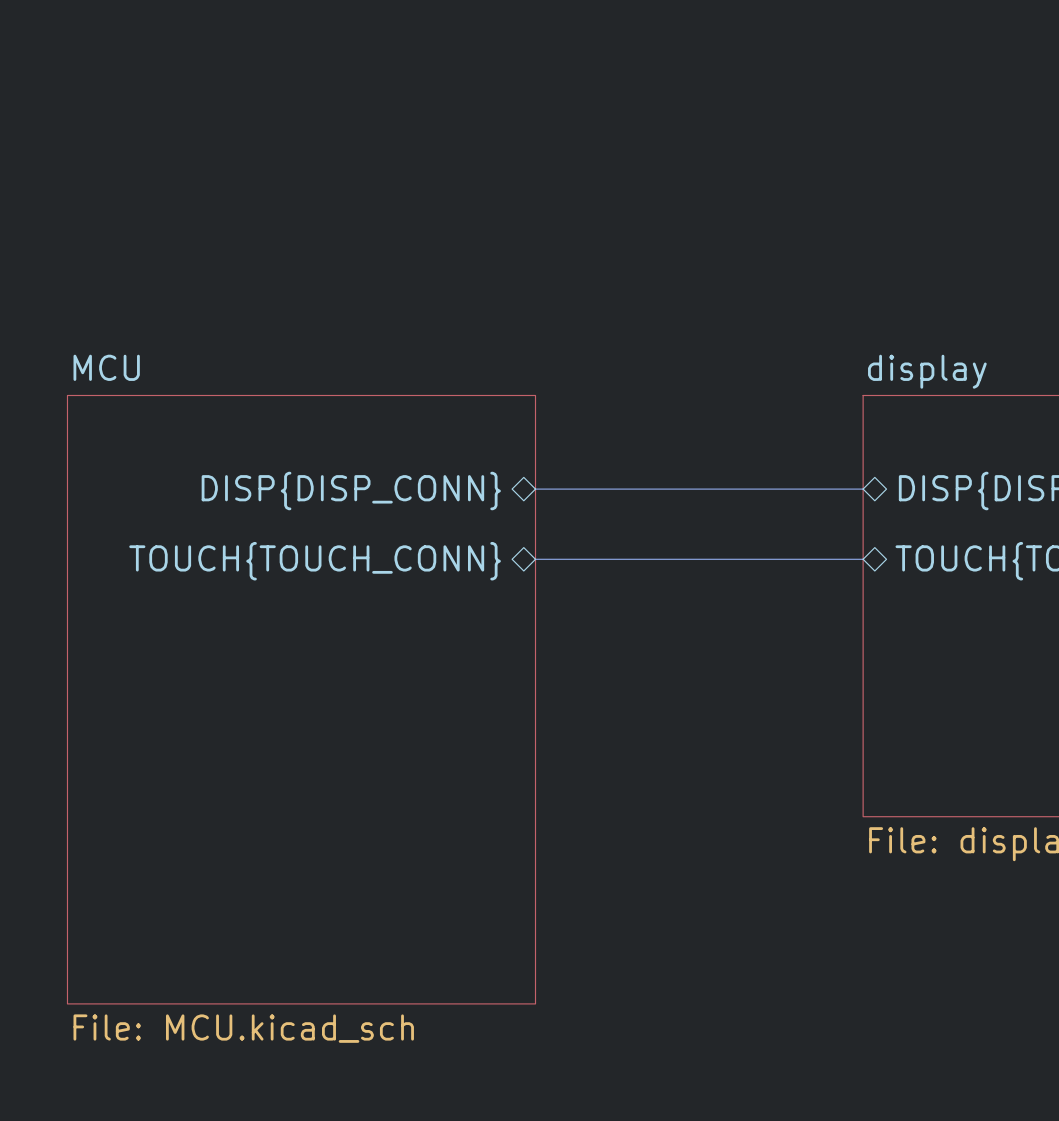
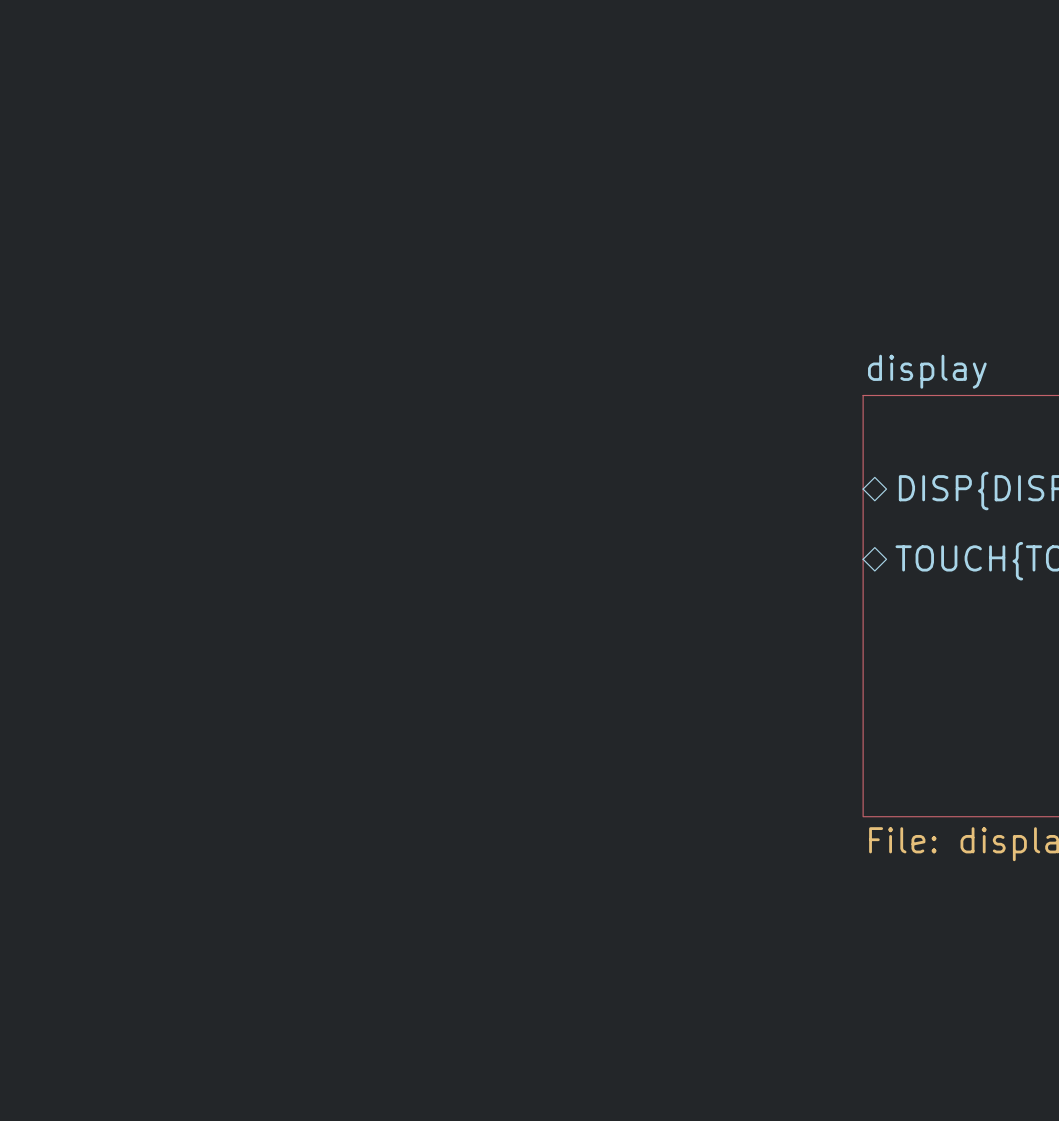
bus: (535, 489) (863, 489) -> none
sheet pin: DISP{DISP_CONN} (351, 491) -> none
bus: (535, 559) (863, 559) -> none
sheet pin: TOUCH{TOUCH_CONN} (315, 561) -> none
sheet MCU: File: MCU.kicad_sch (301, 699) -> none

